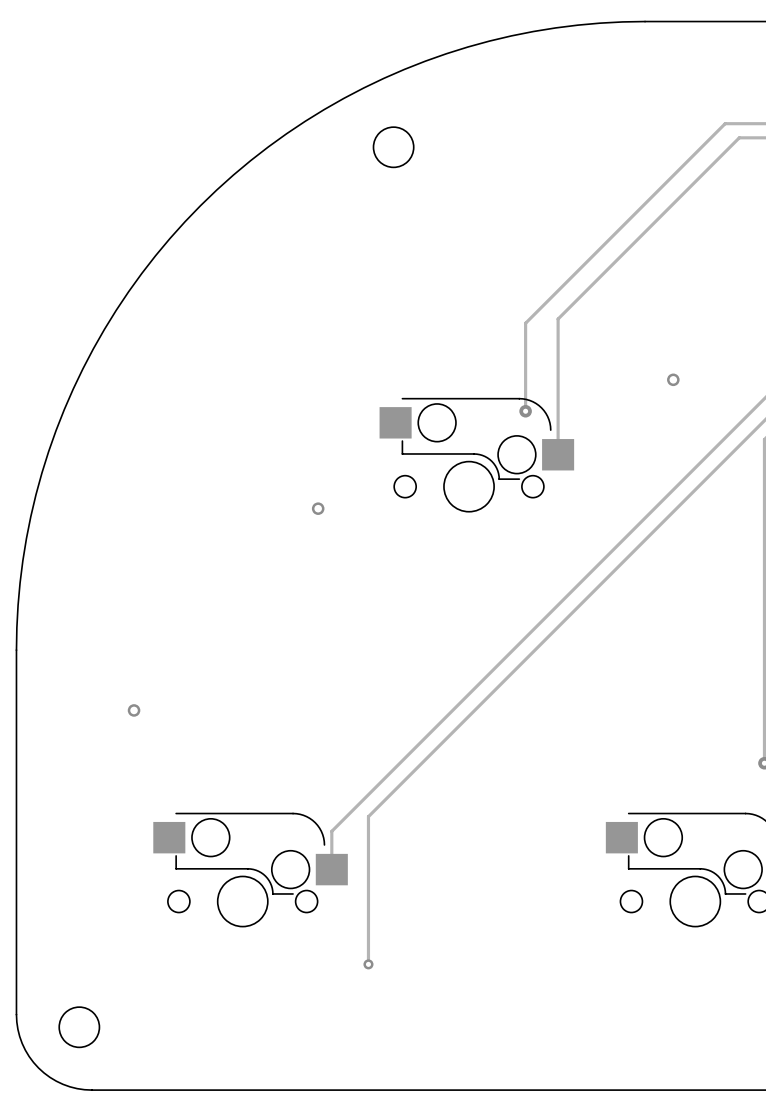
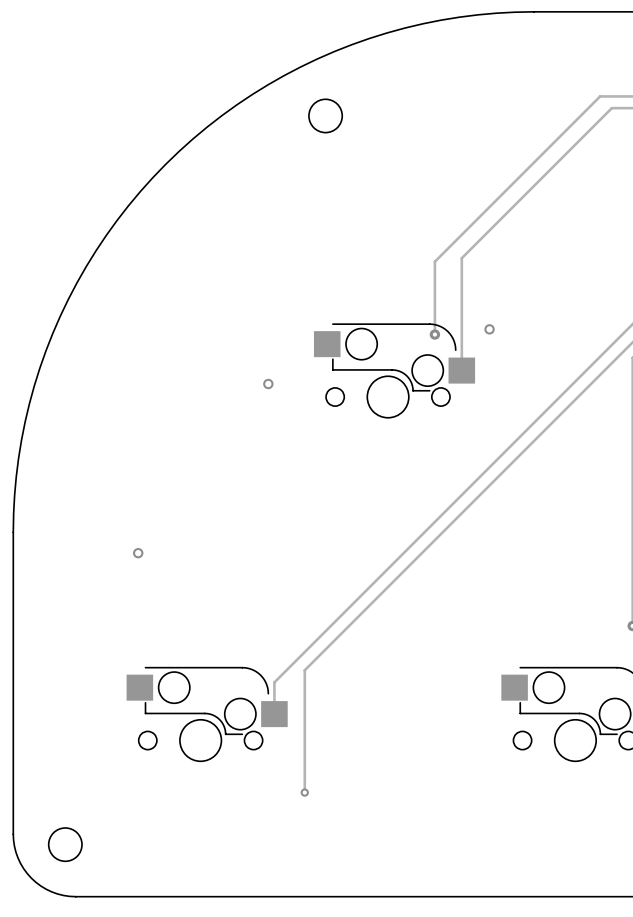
via: (673, 379) -> none
via: none -> (489, 329)
via position: (318, 508) -> (268, 384)
via position: (134, 710) -> (138, 553)

